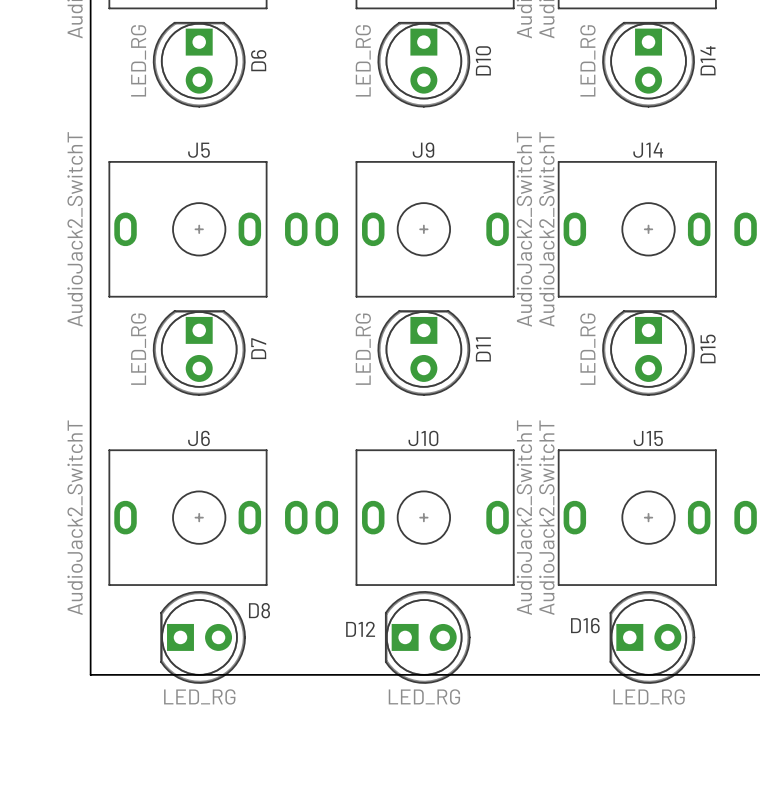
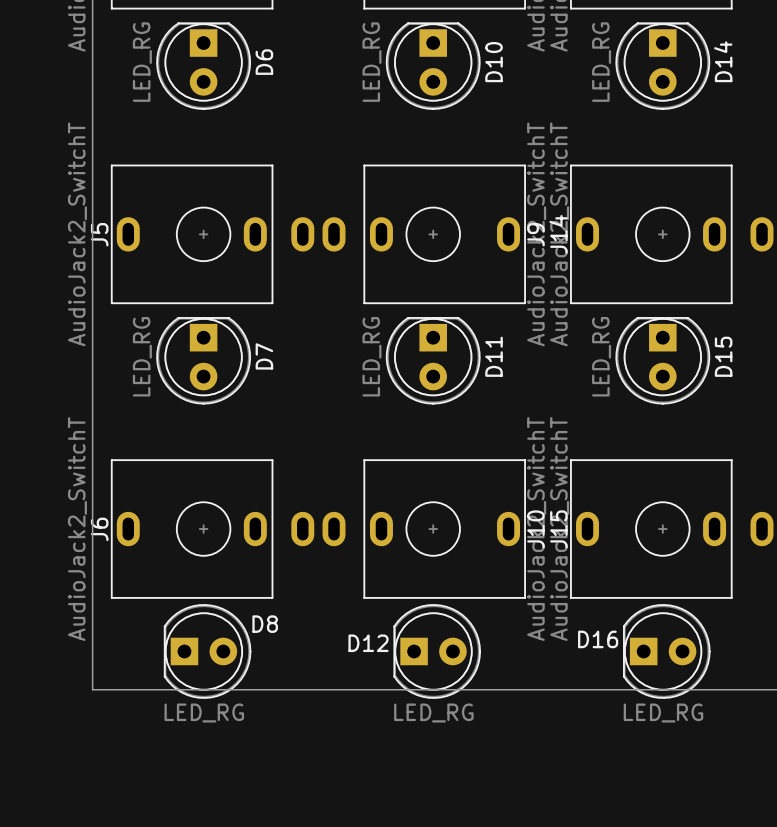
J5 name rotation: 0° (198, 150) -> 90° counterclockwise (99, 234)
J5 name position: J5 (198, 150) -> J5 (99, 234)
J9 name rotation: 0° (423, 150) -> 90° counterclockwise (535, 234)
J9 name position: J9 (423, 150) -> J9 (535, 234)
J14 name rotation: 0° (648, 150) -> 90° counterclockwise (558, 234)
J14 name position: J14 (648, 150) -> J14 (558, 234)
J6 name rotation: 0° (198, 438) -> 90° counterclockwise (99, 529)
J6 name position: J6 (198, 438) -> J6 (99, 529)
J10 name rotation: 0° (423, 438) -> 90° counterclockwise (535, 529)
J10 name position: J10 (423, 438) -> J10 (535, 529)
J15 name rotation: 0° (648, 438) -> 90° counterclockwise (558, 529)
J15 name position: J15 (648, 438) -> J15 (558, 529)

